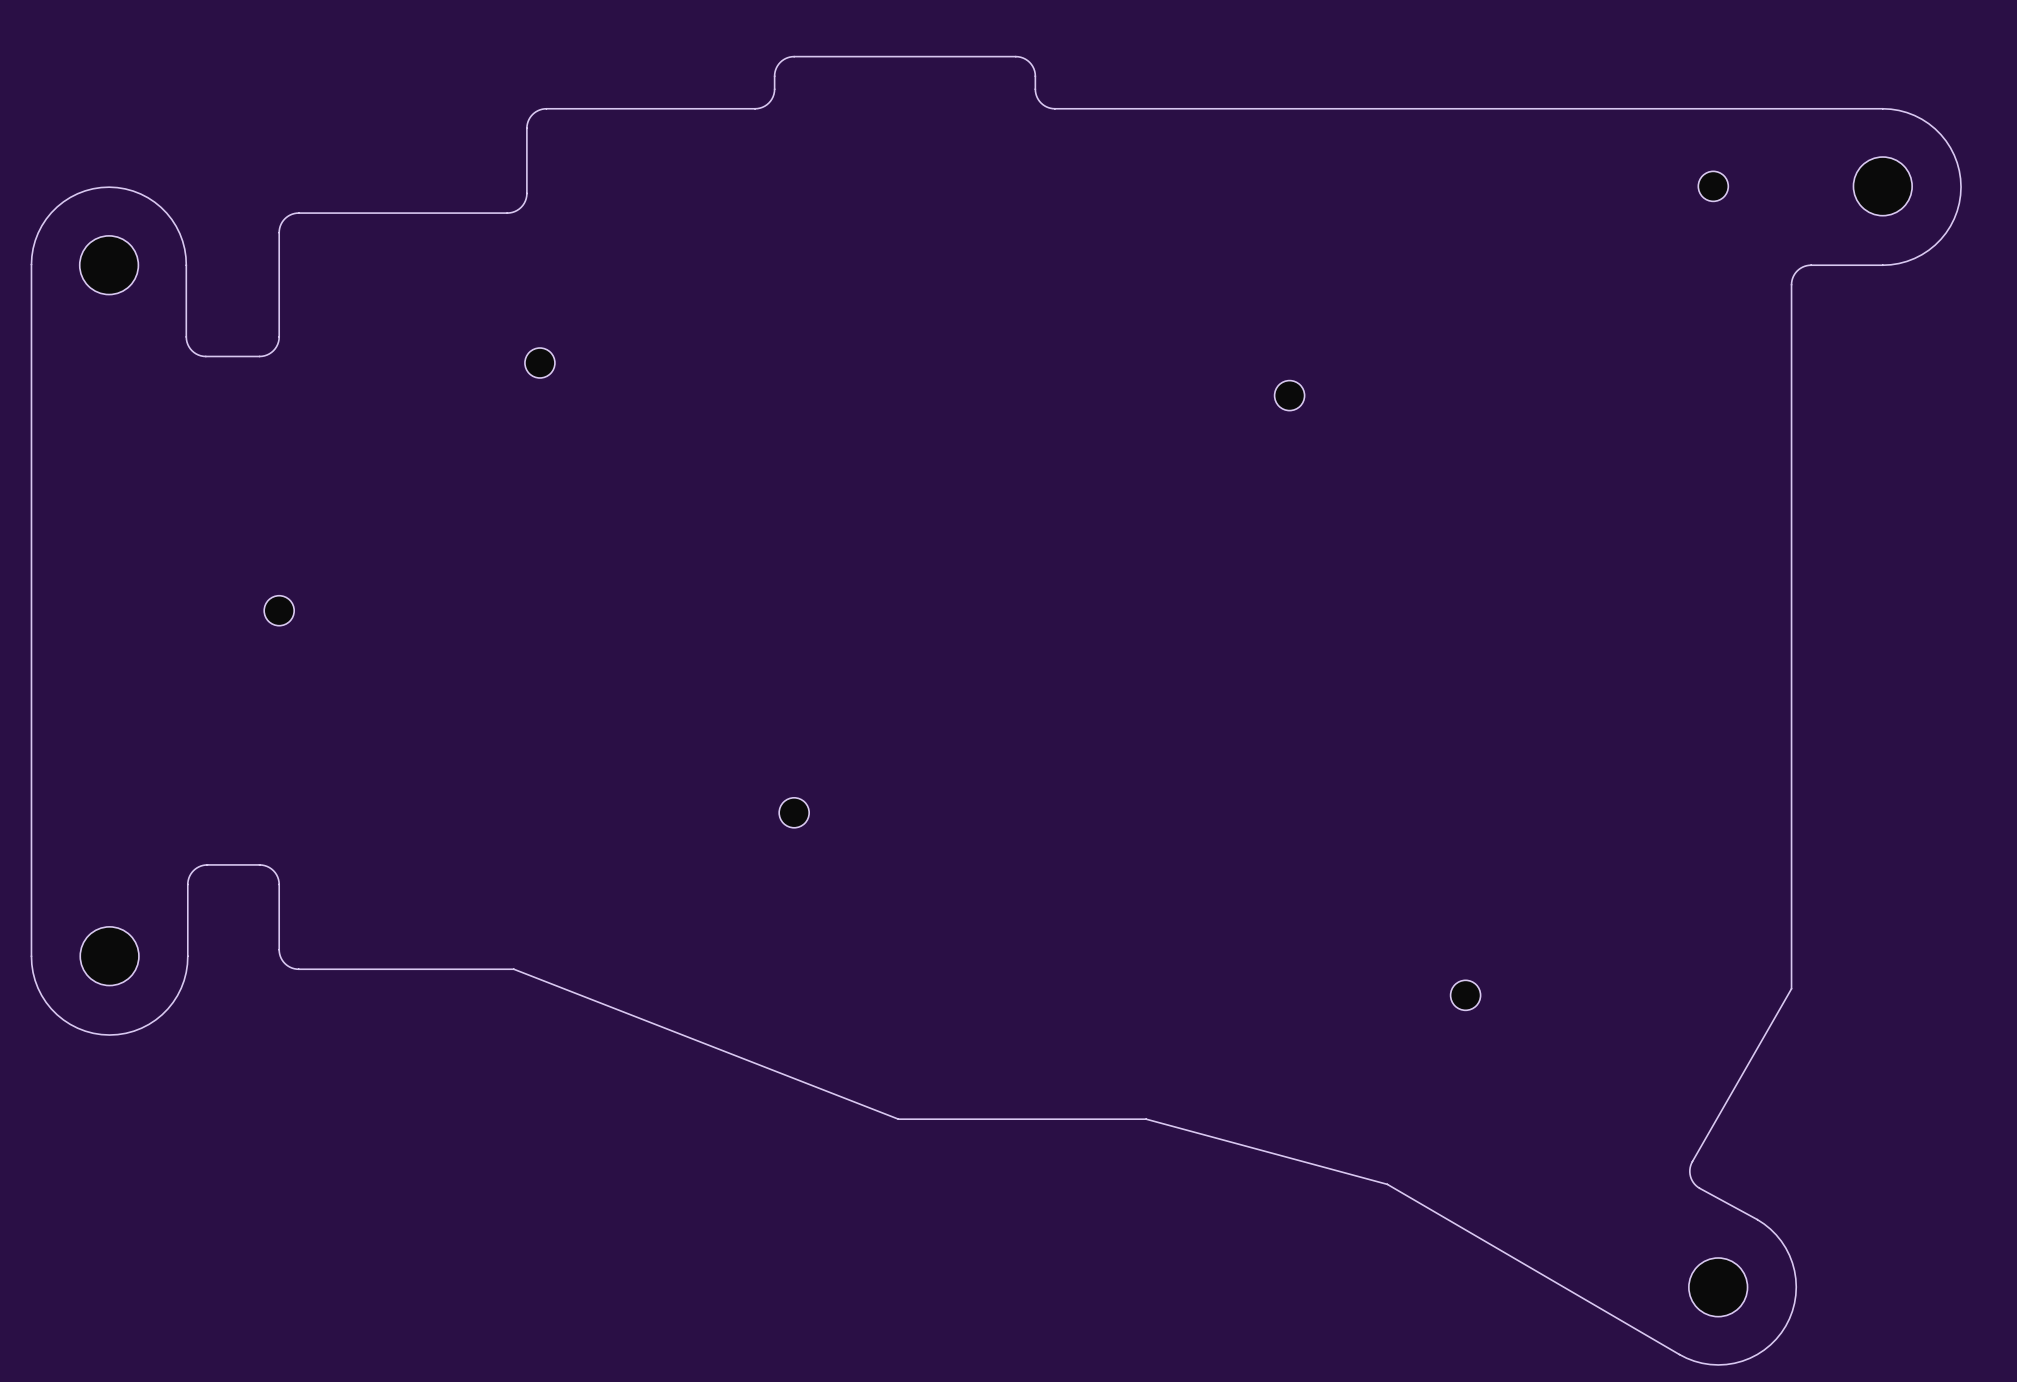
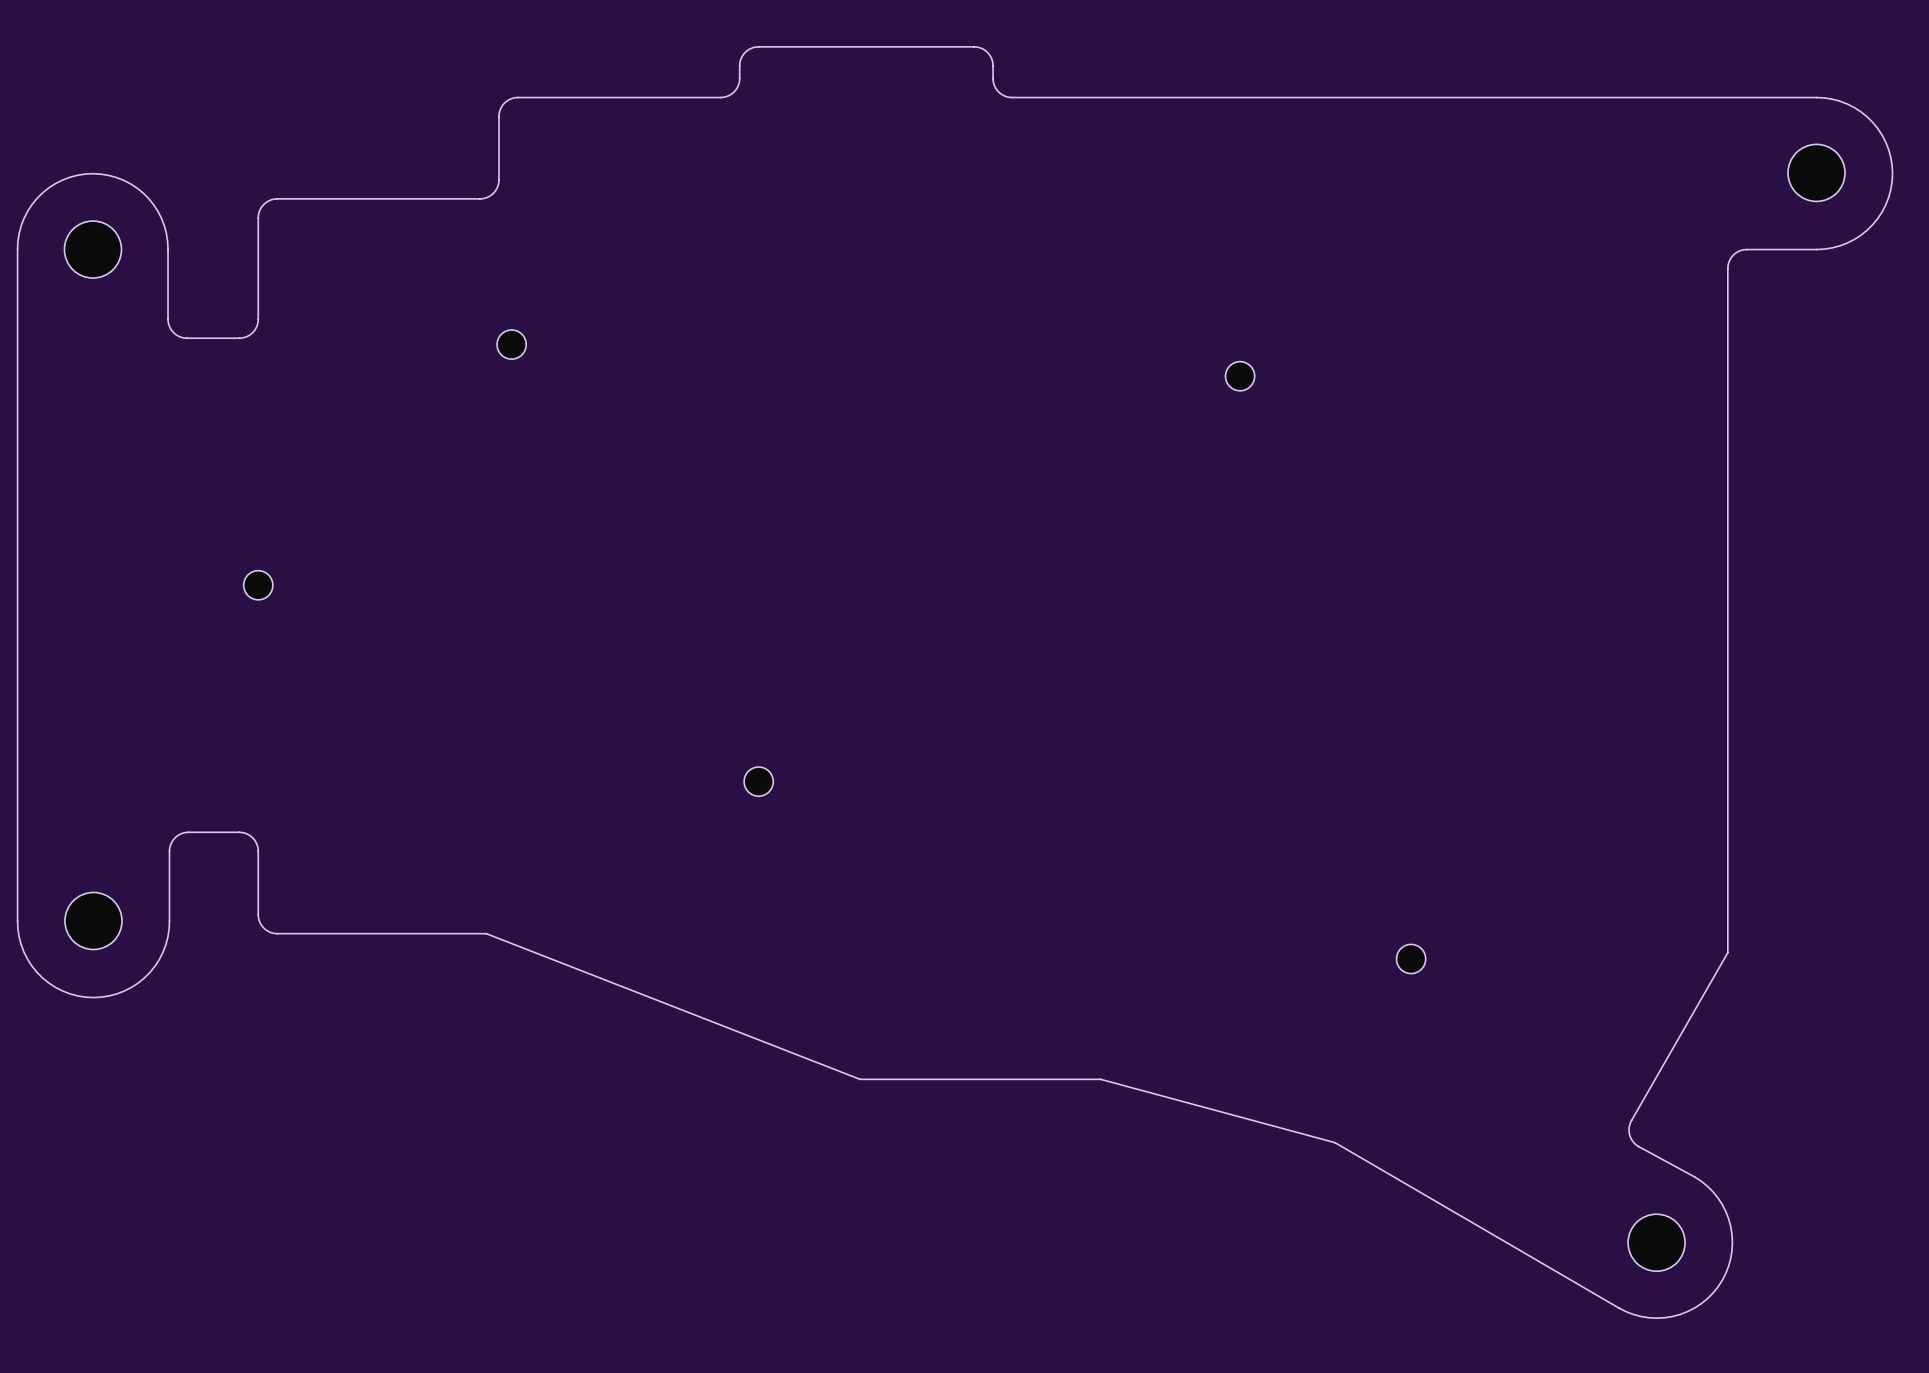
part: (1713, 186) -> none

